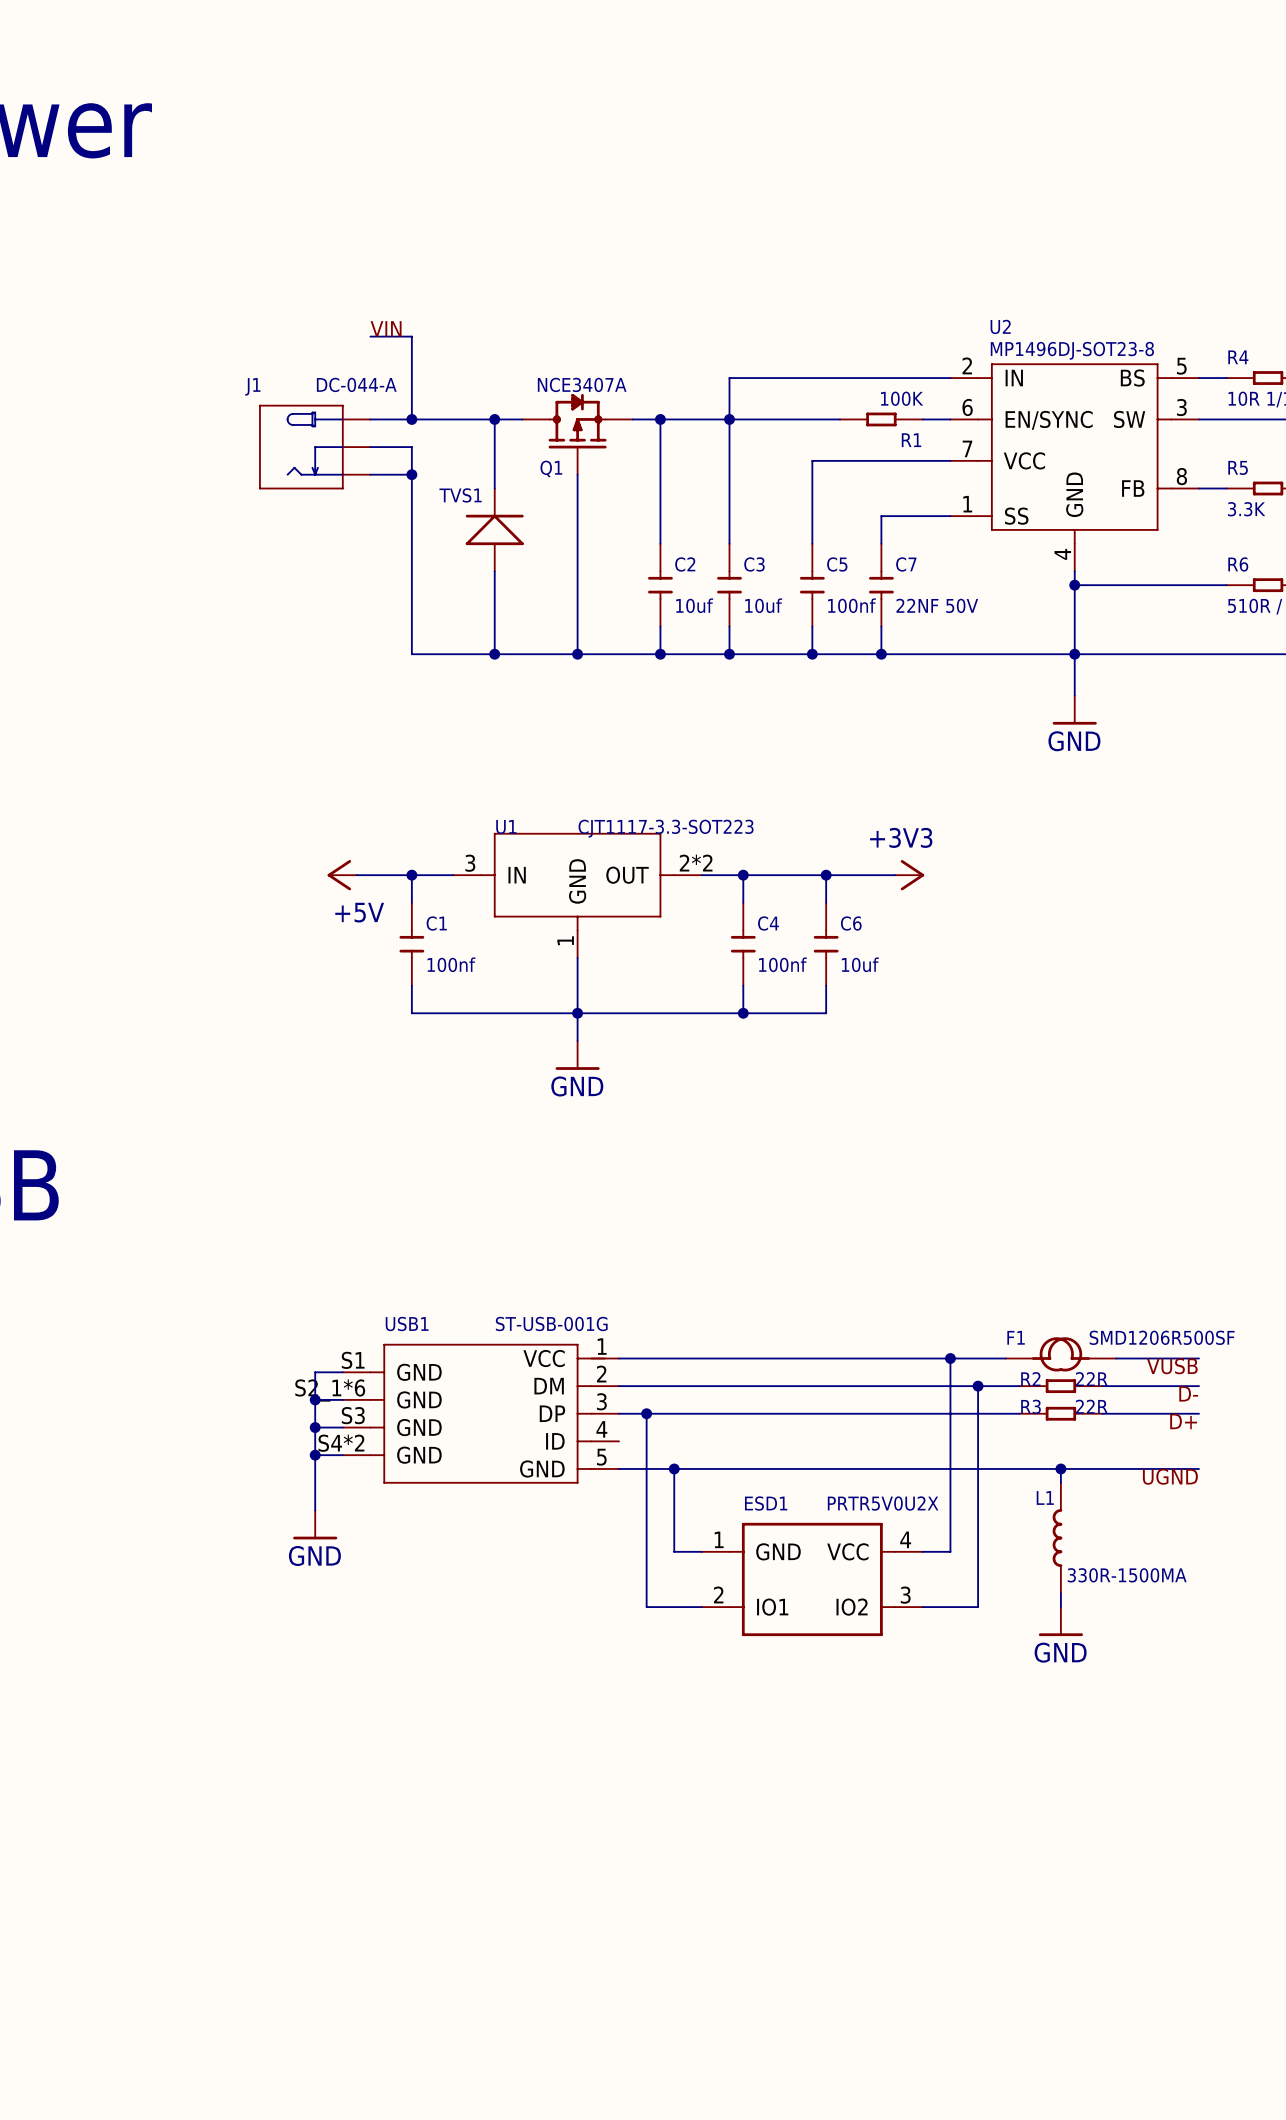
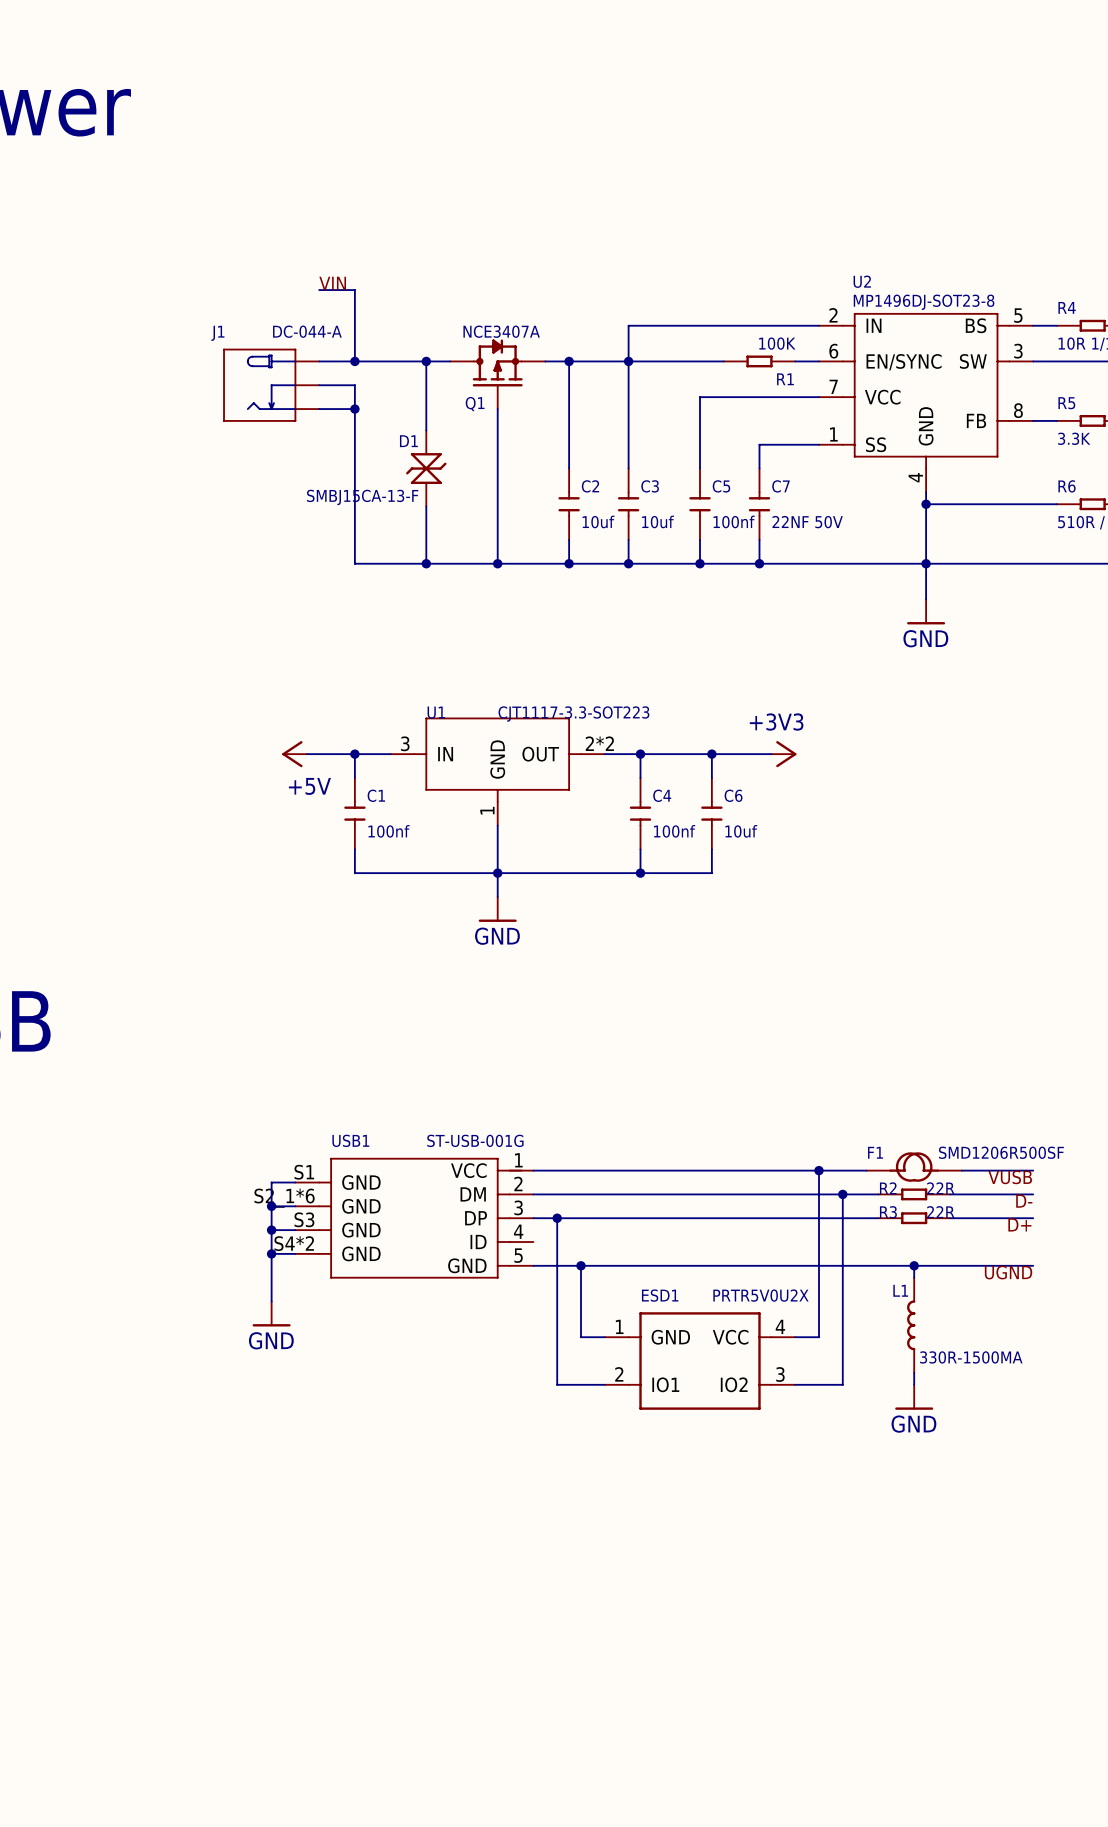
TVS1: (494, 529) -> none
D1: none -> SMBJ15CA-13-F (426, 468)

